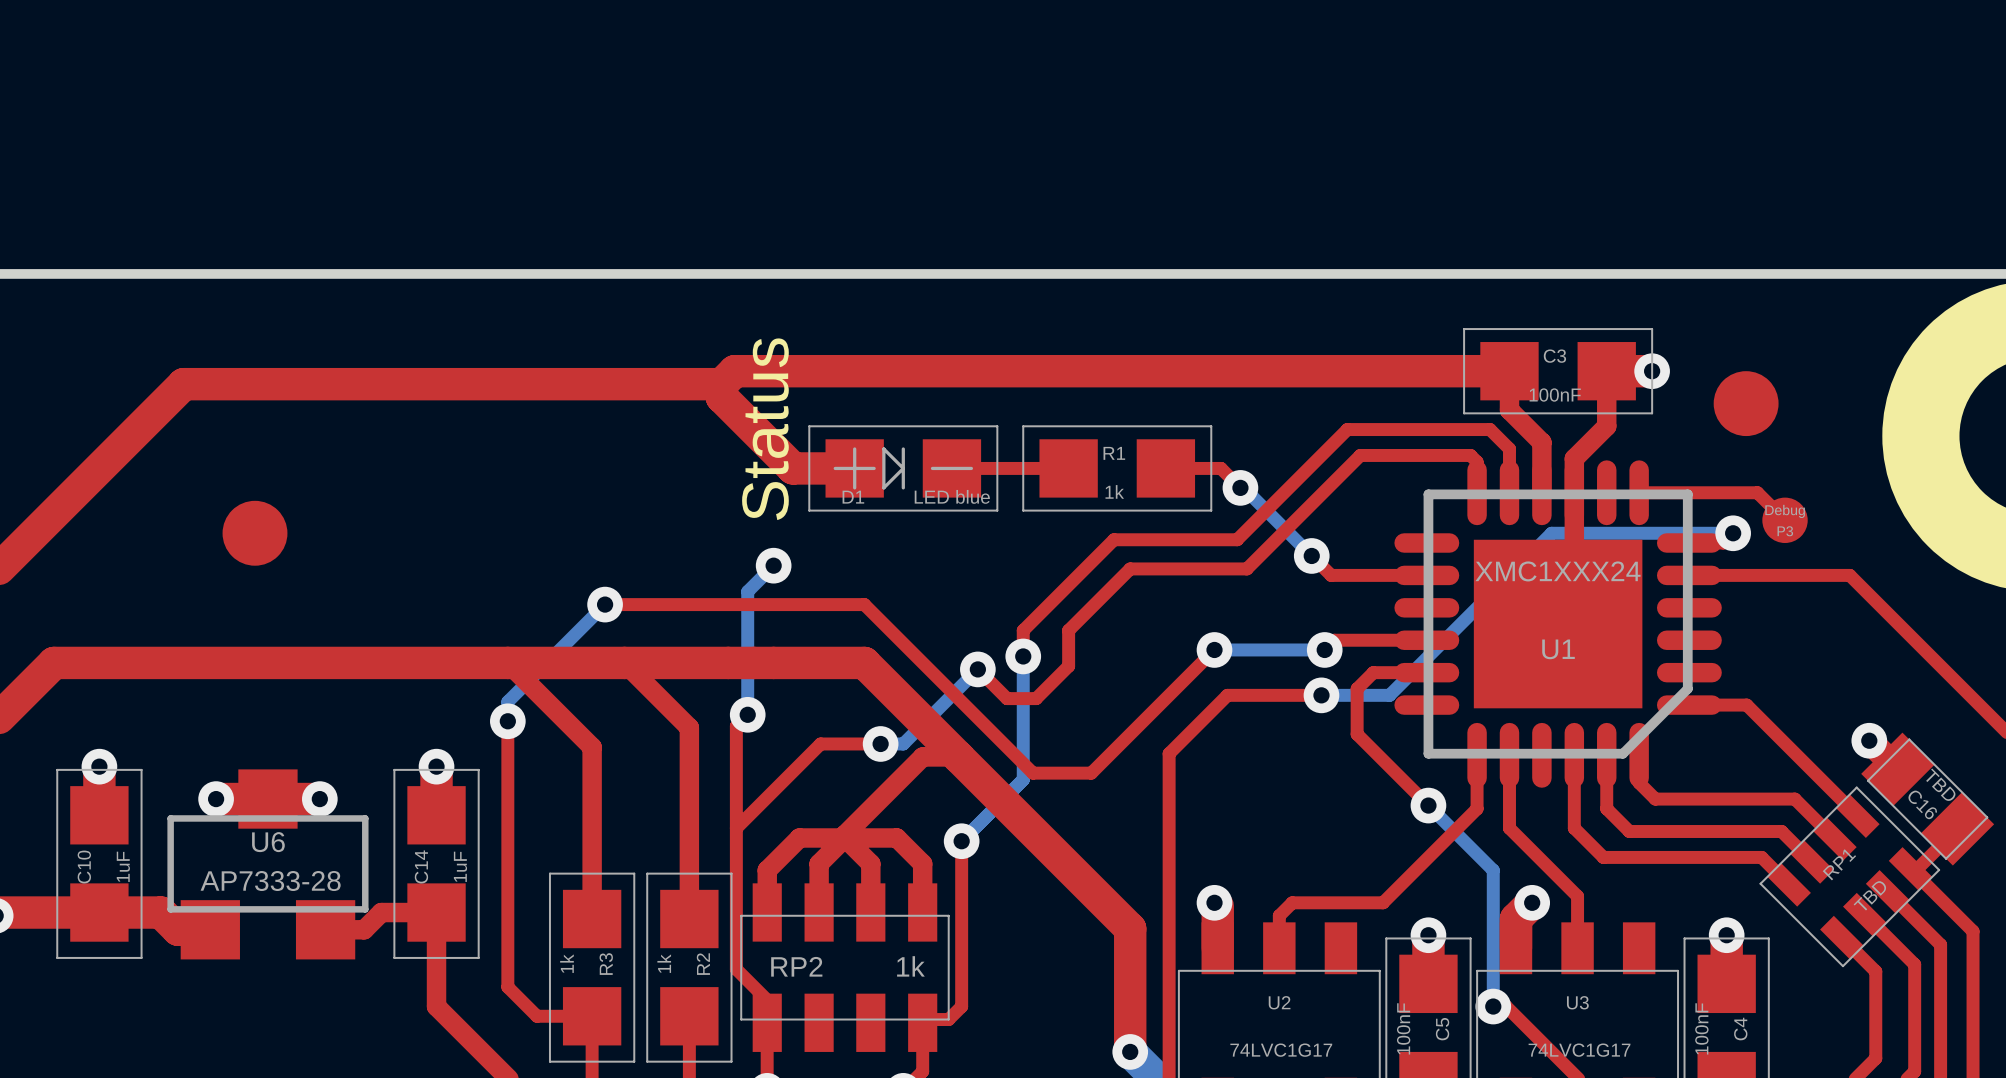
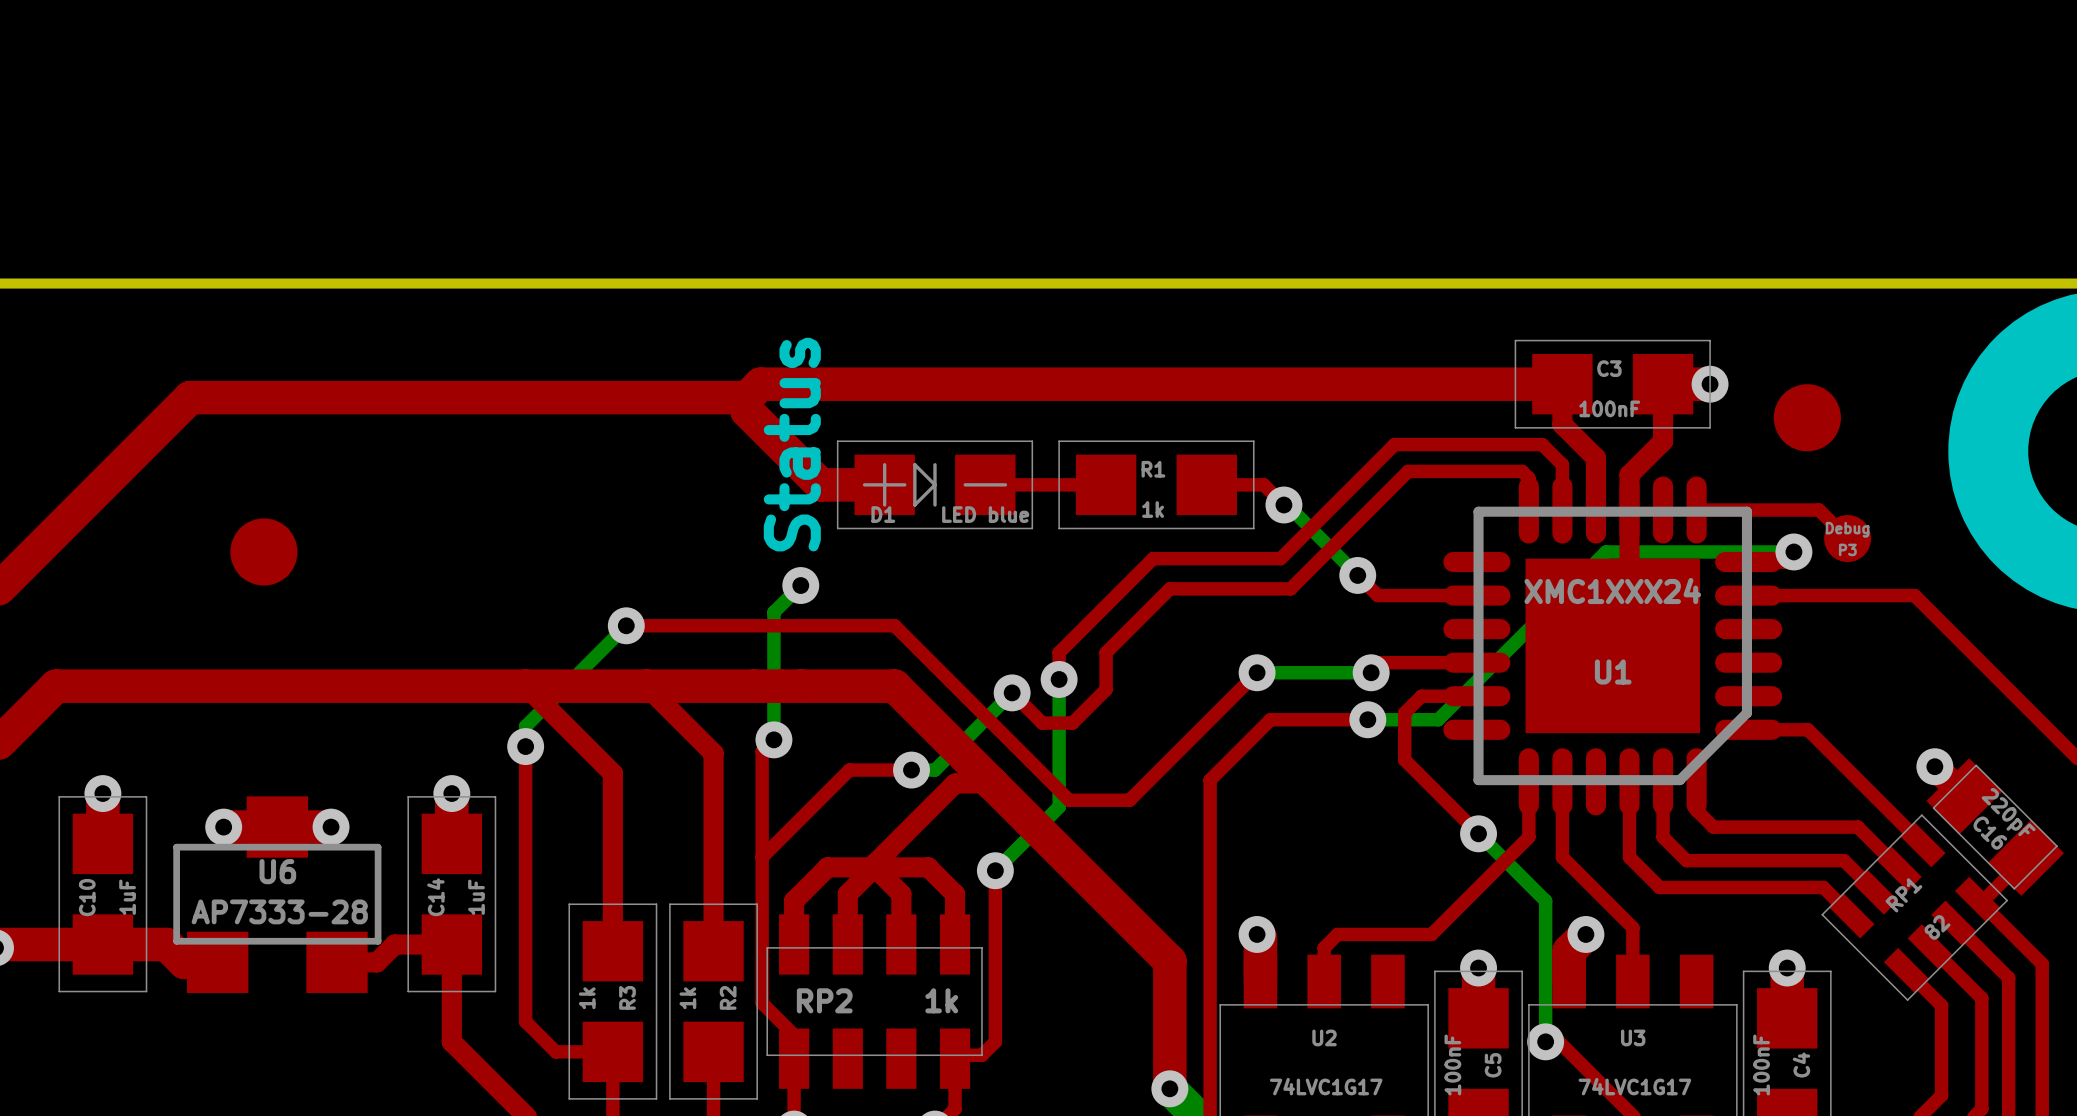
C16 value: TBD (1940, 784) -> 220pF (2008, 812)
RP1 value: TBD (1870, 895) -> 82 (1937, 927)

